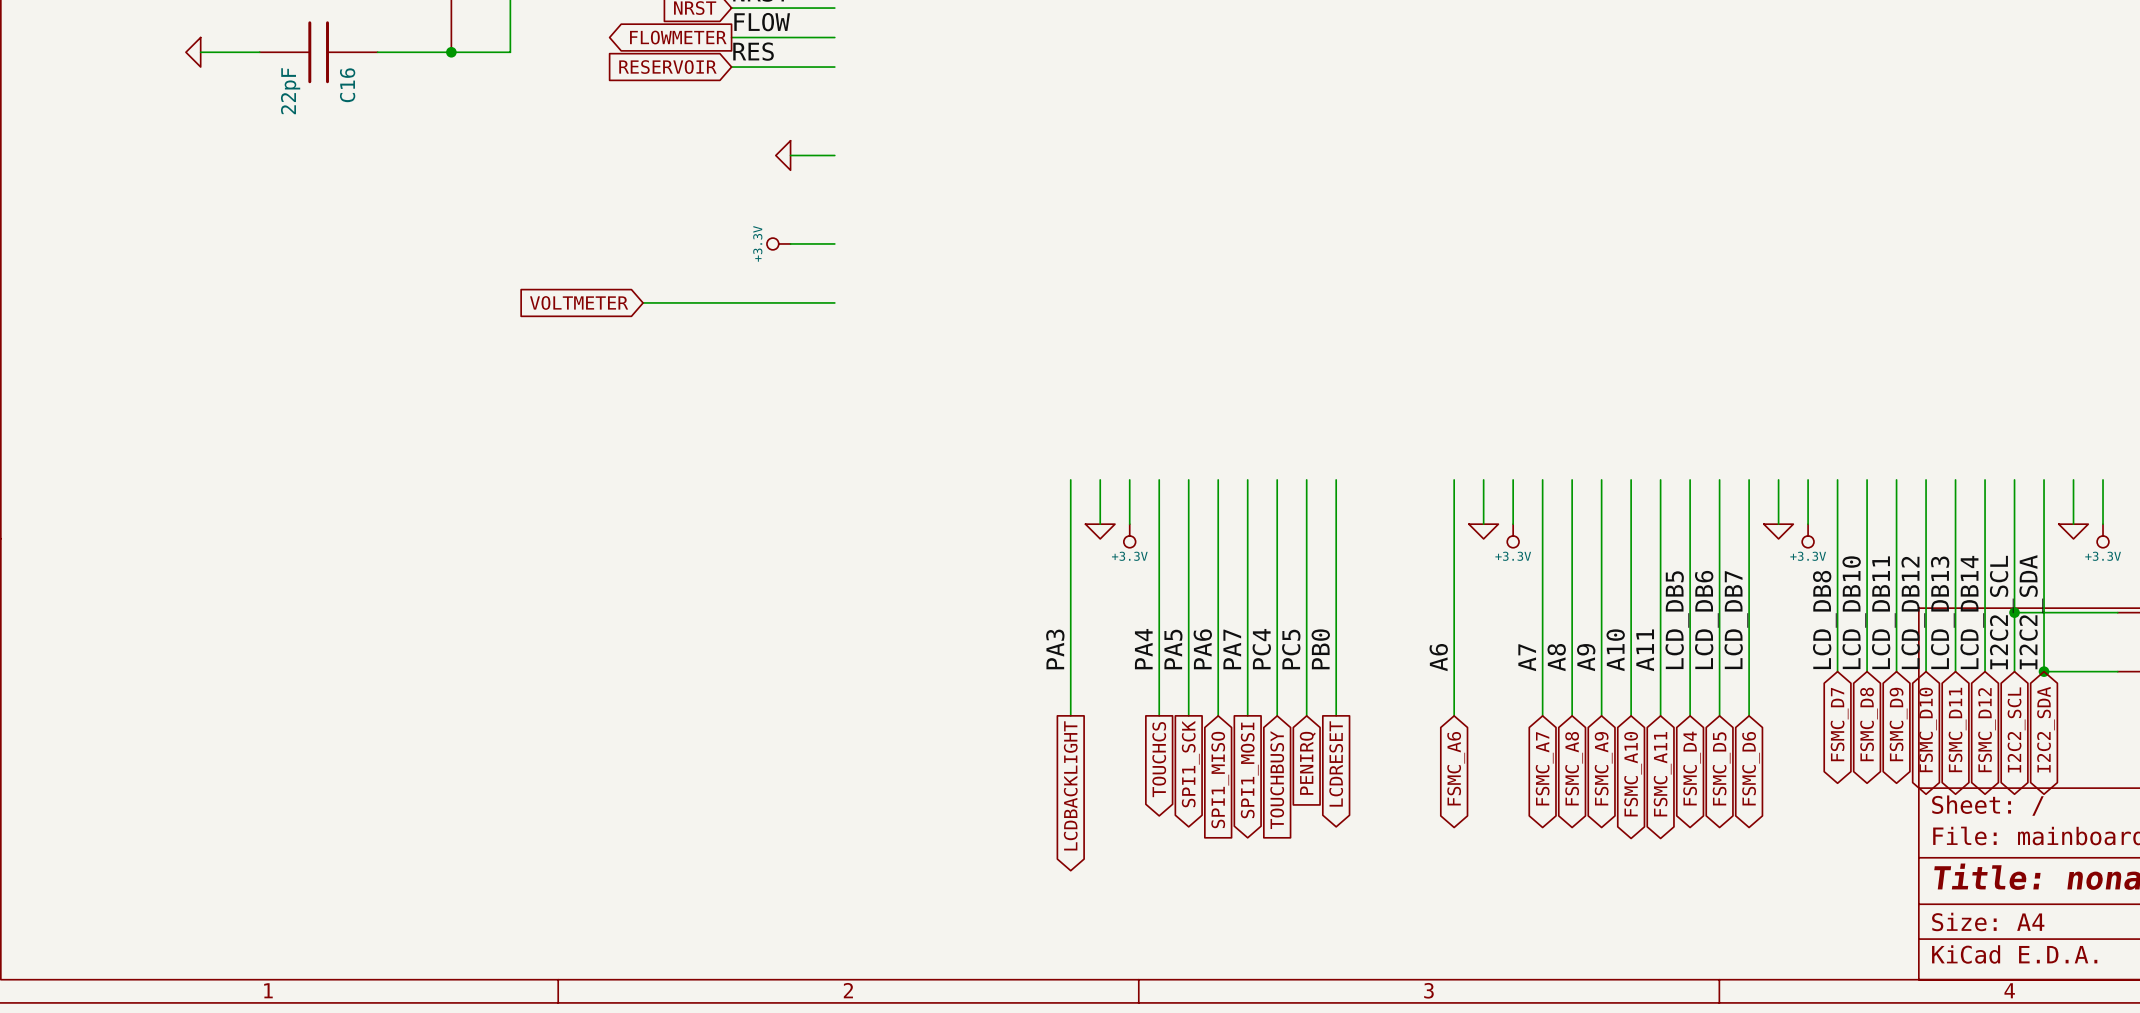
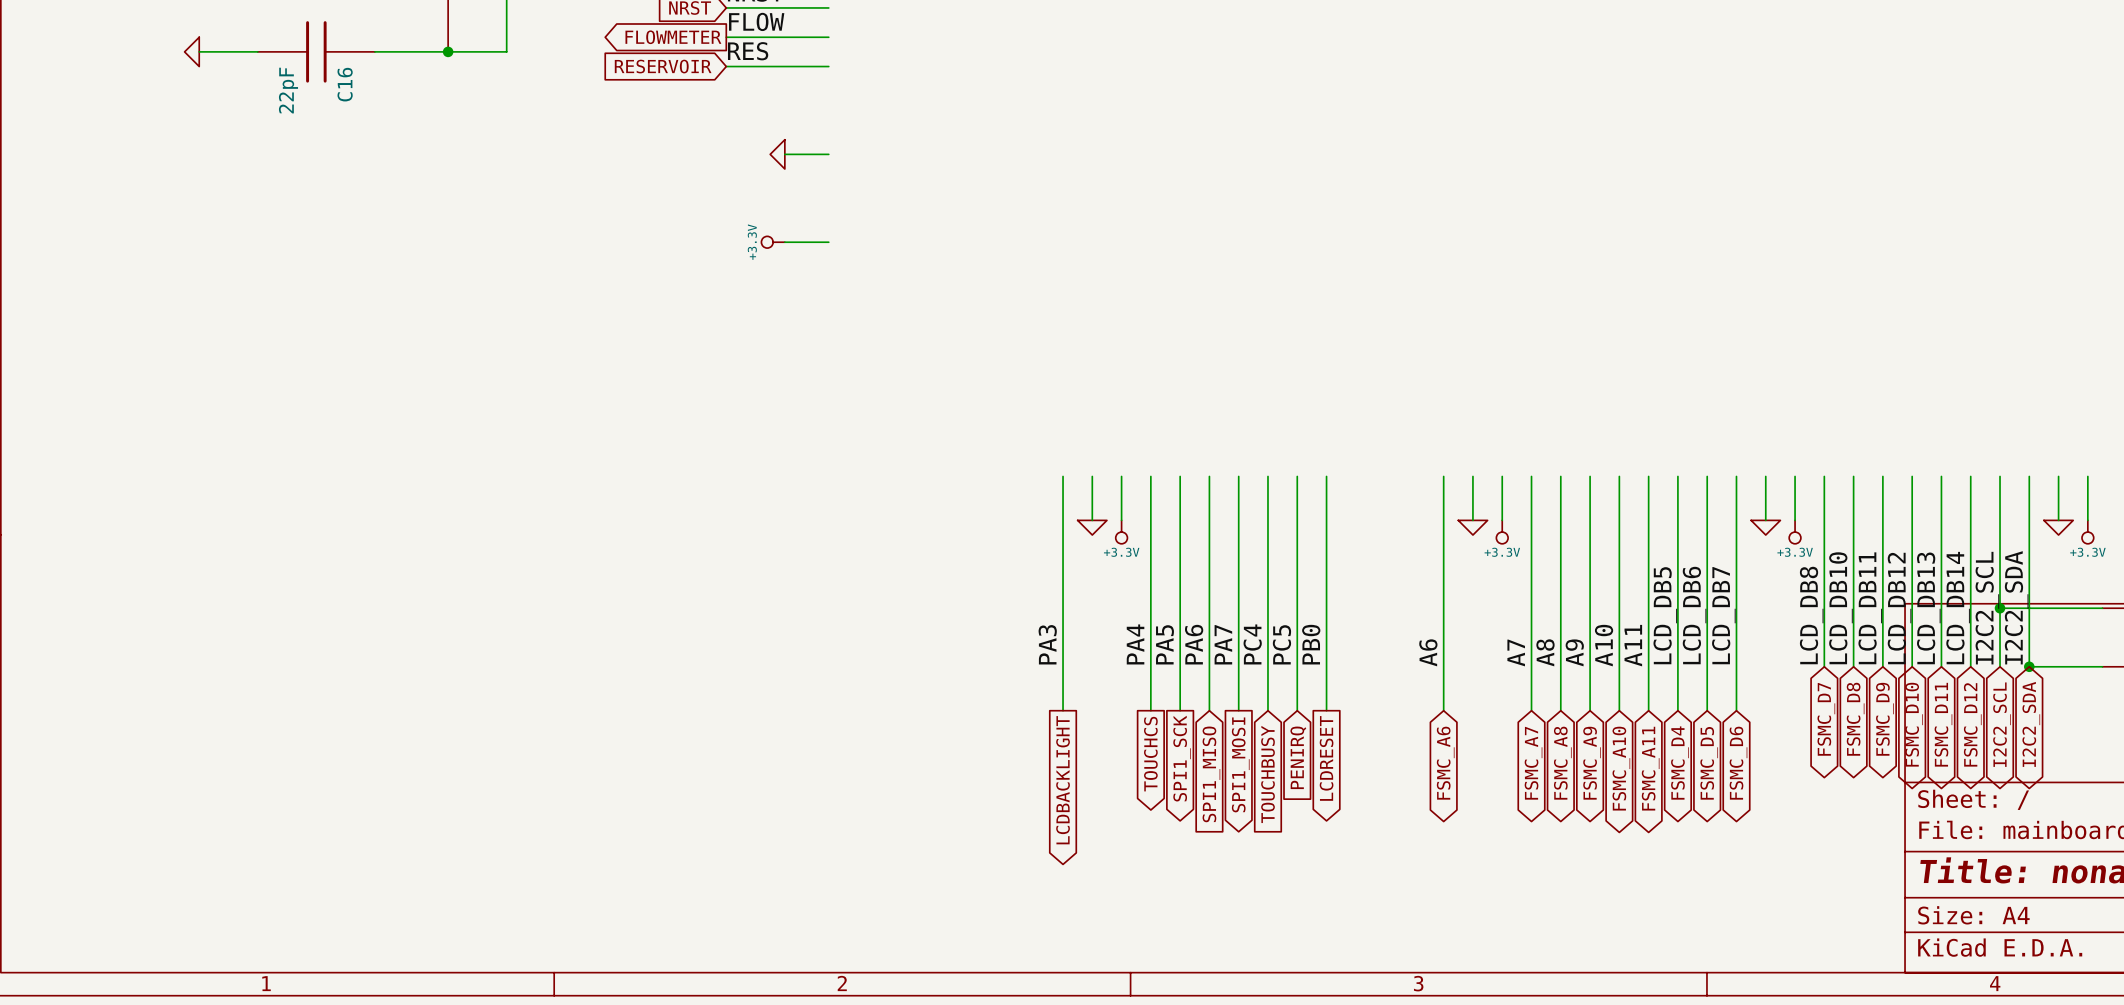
global label: VOLTMETER (579, 302) -> none
wire: (643, 302) (834, 302) -> none

